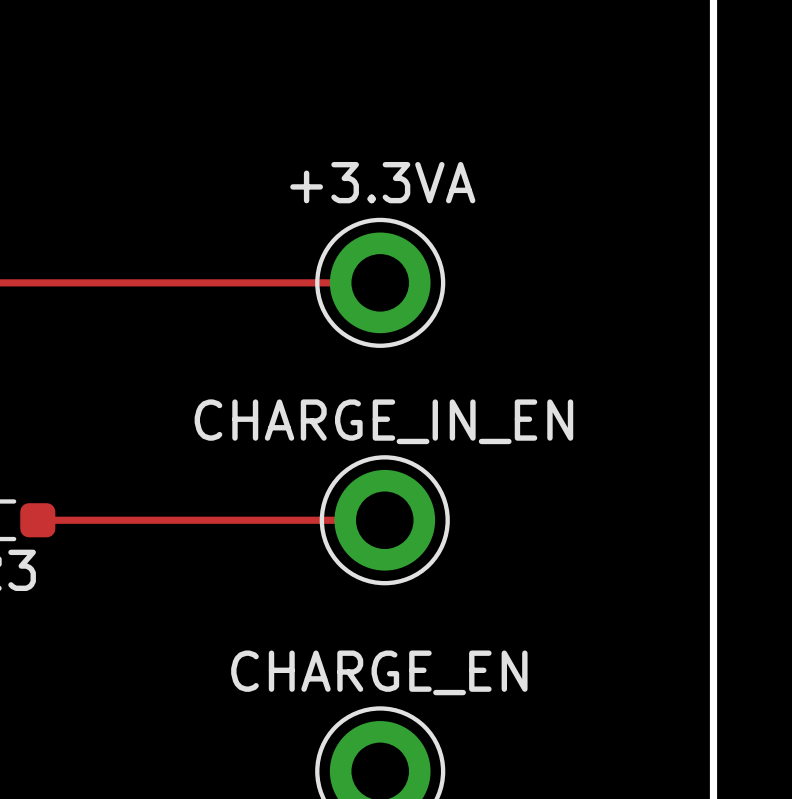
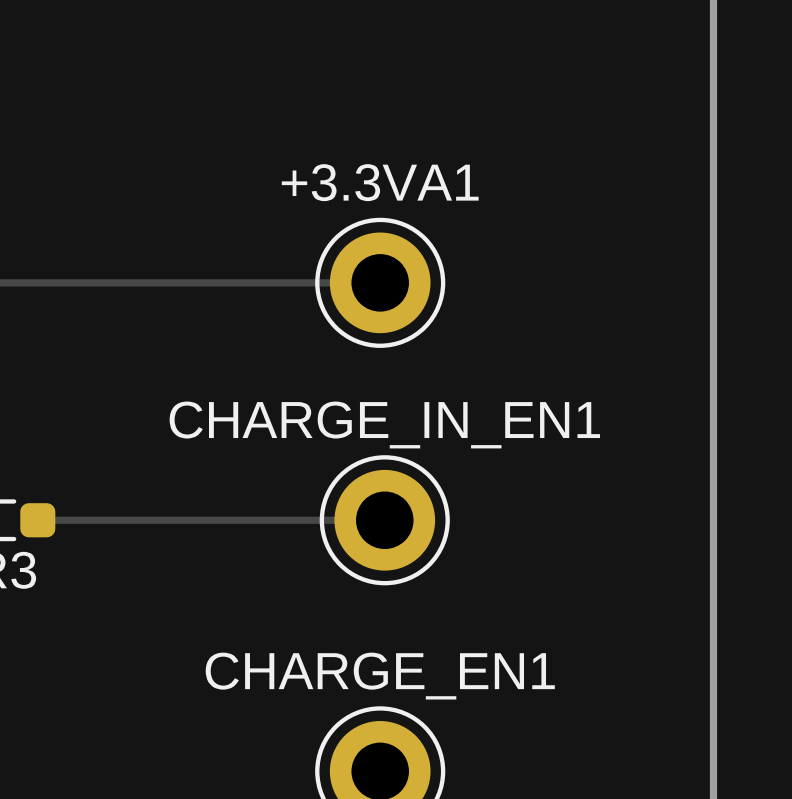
+3.3VA name: +3.3VA (382, 182) -> +3.3VA1 (380, 182)
CHARGE_IN_EN name: CHARGE_IN_EN (383, 421) -> CHARGE_IN_EN1 (384, 424)
CHARGE_EN name: CHARGE_EN (379, 672) -> CHARGE_EN1 (380, 676)

